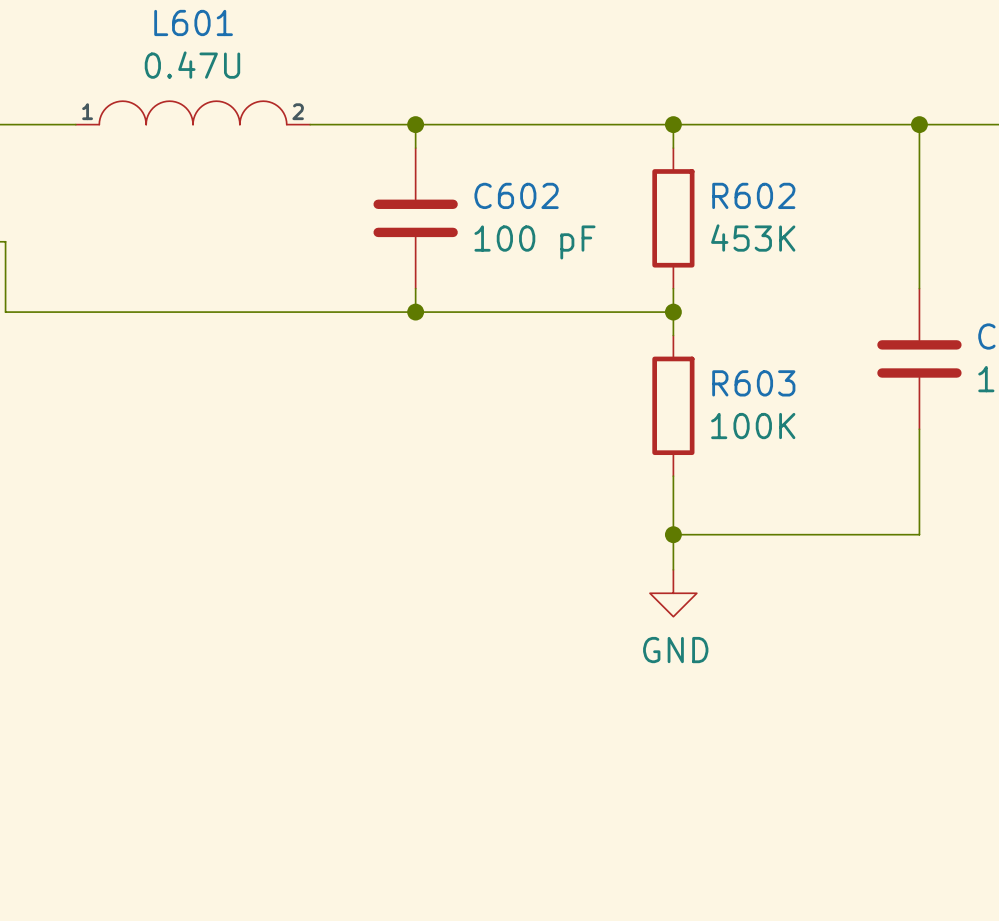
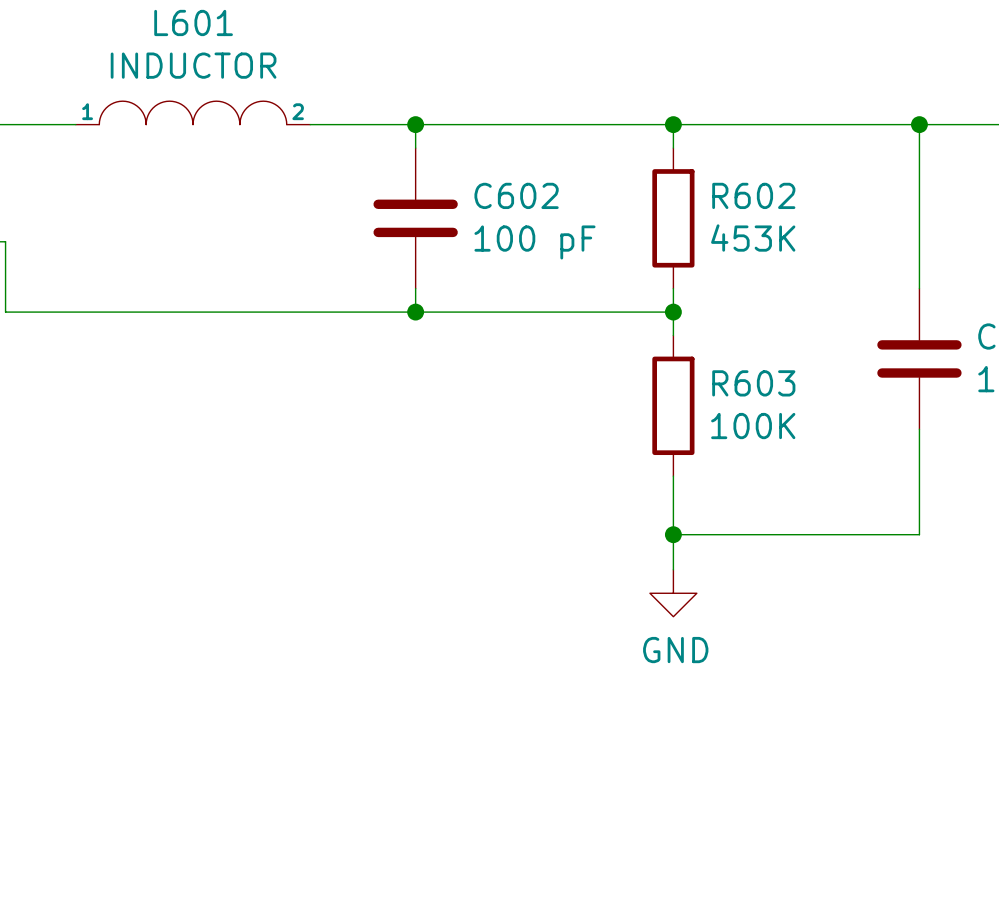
L601 value: 0.47U (192, 65) -> INDUCTOR (193, 65)

